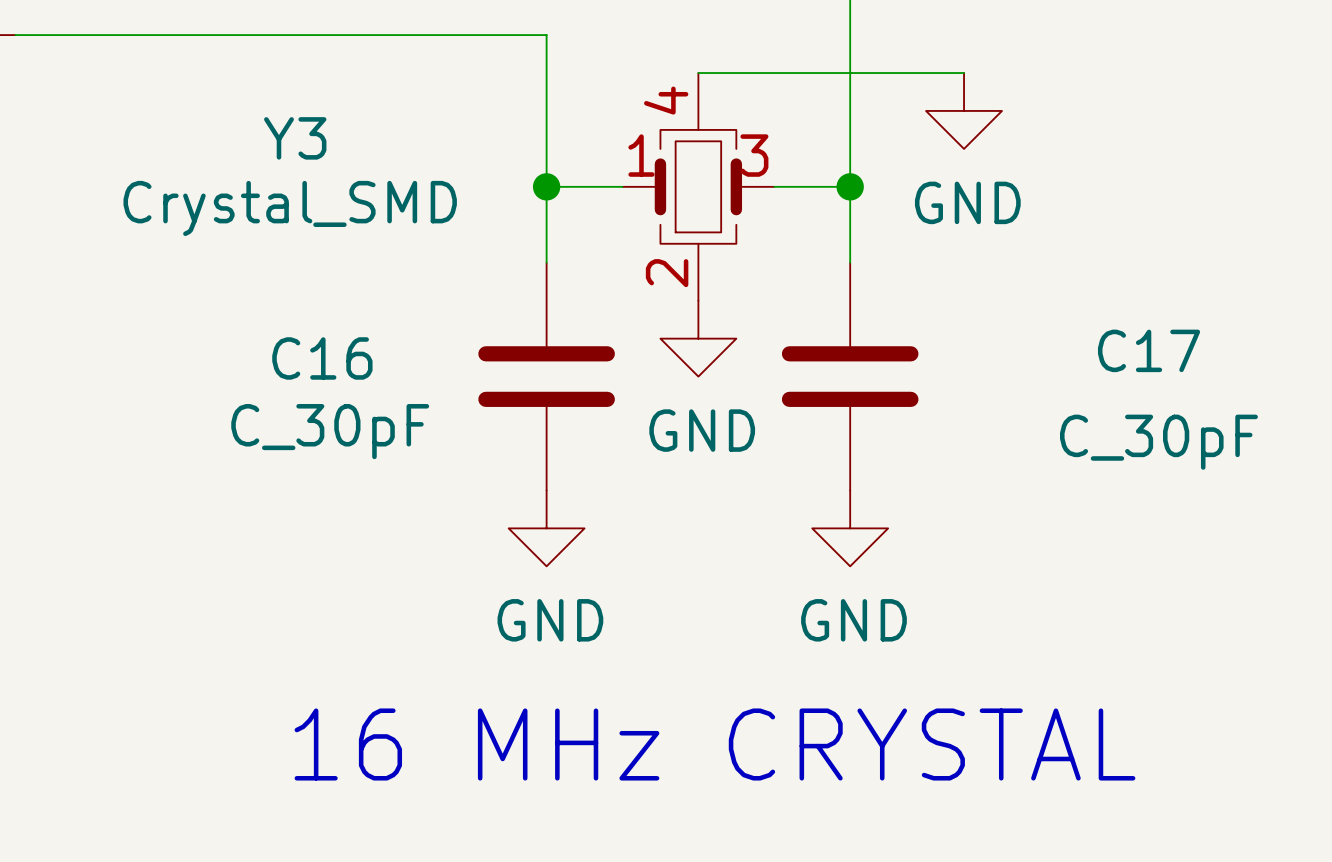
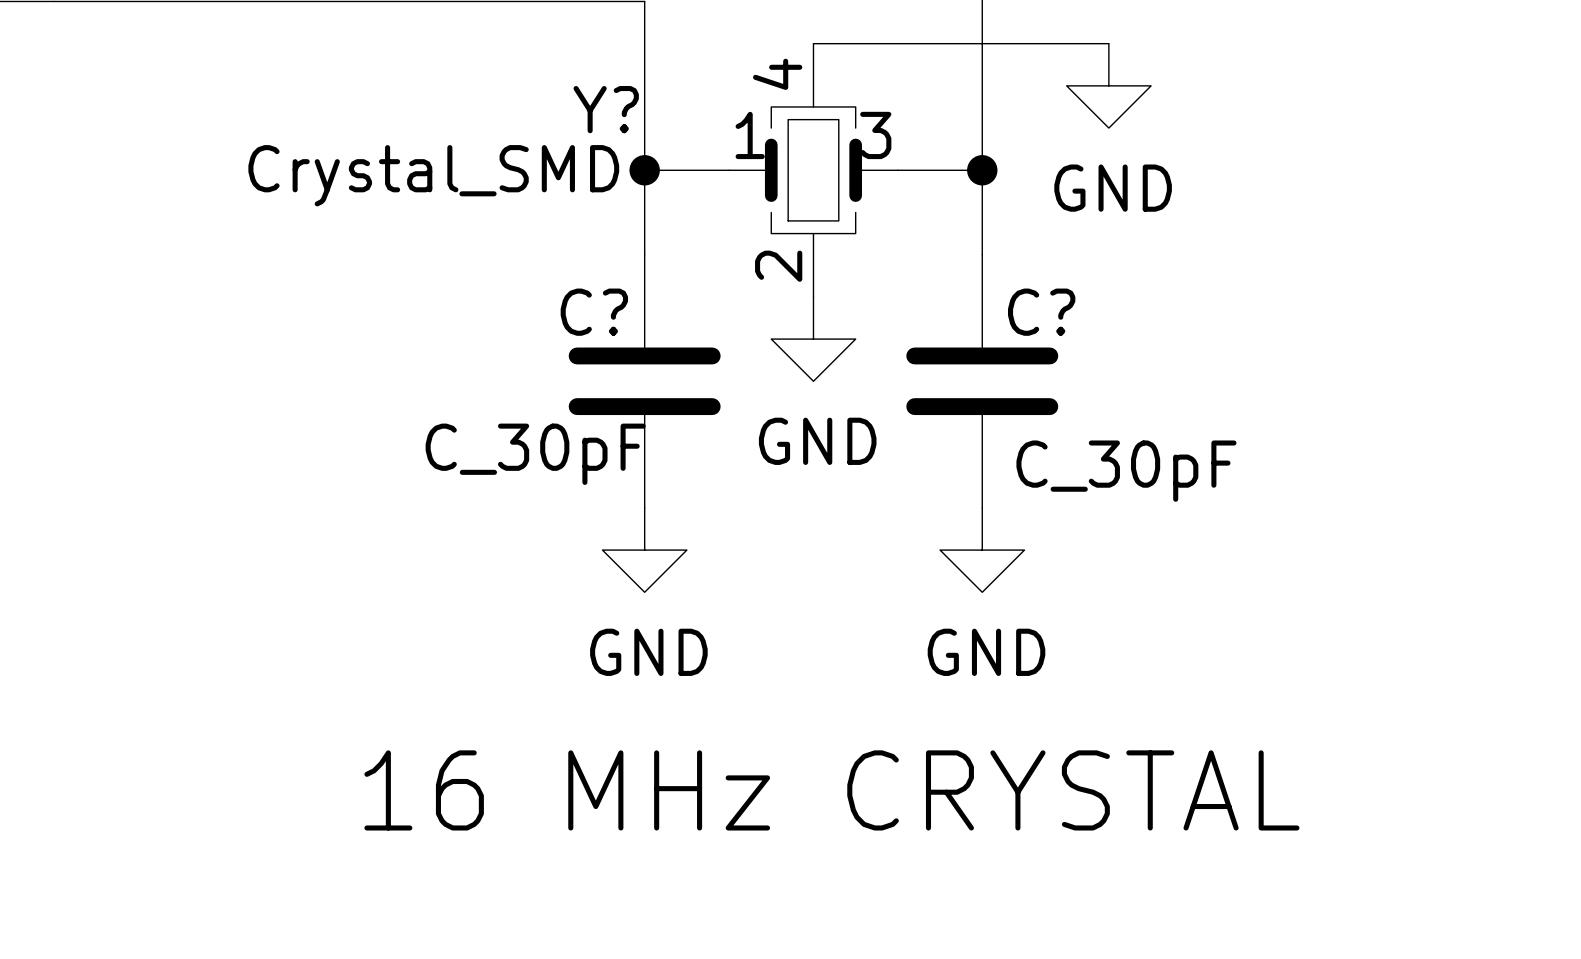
Y3 name: Y3 (295, 138) -> Y? (606, 109)
Y3 value position: Crystal_SMD (290, 208) -> Crystal_SMD (433, 175)
C17 name: C17 (1149, 350) -> C? (1041, 312)
C16 name: C16 (322, 358) -> C? (594, 312)
C16 value position: C_30pF (330, 431) -> C_30pF (535, 454)
C17 value position: C_30pF (1158, 442) -> C_30pF (1126, 471)

